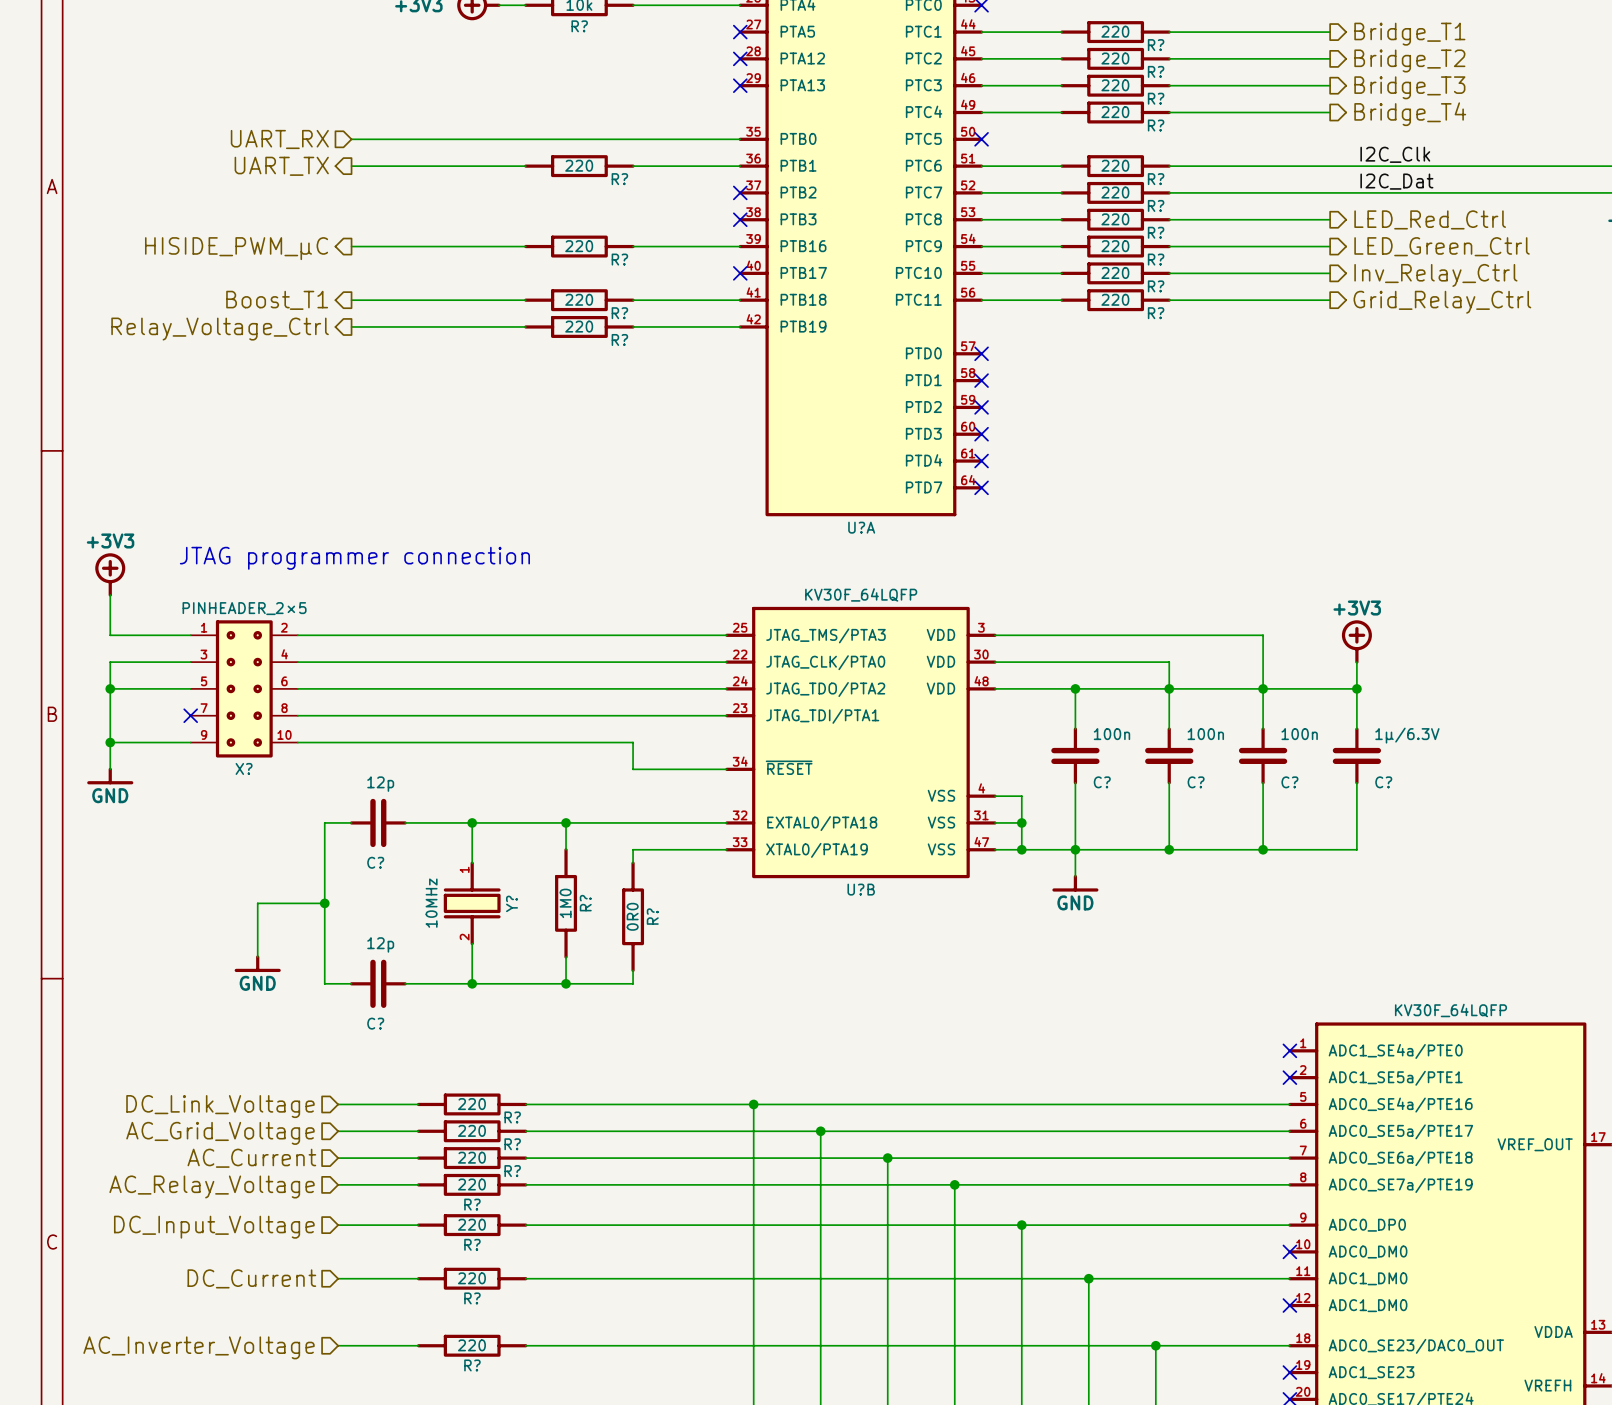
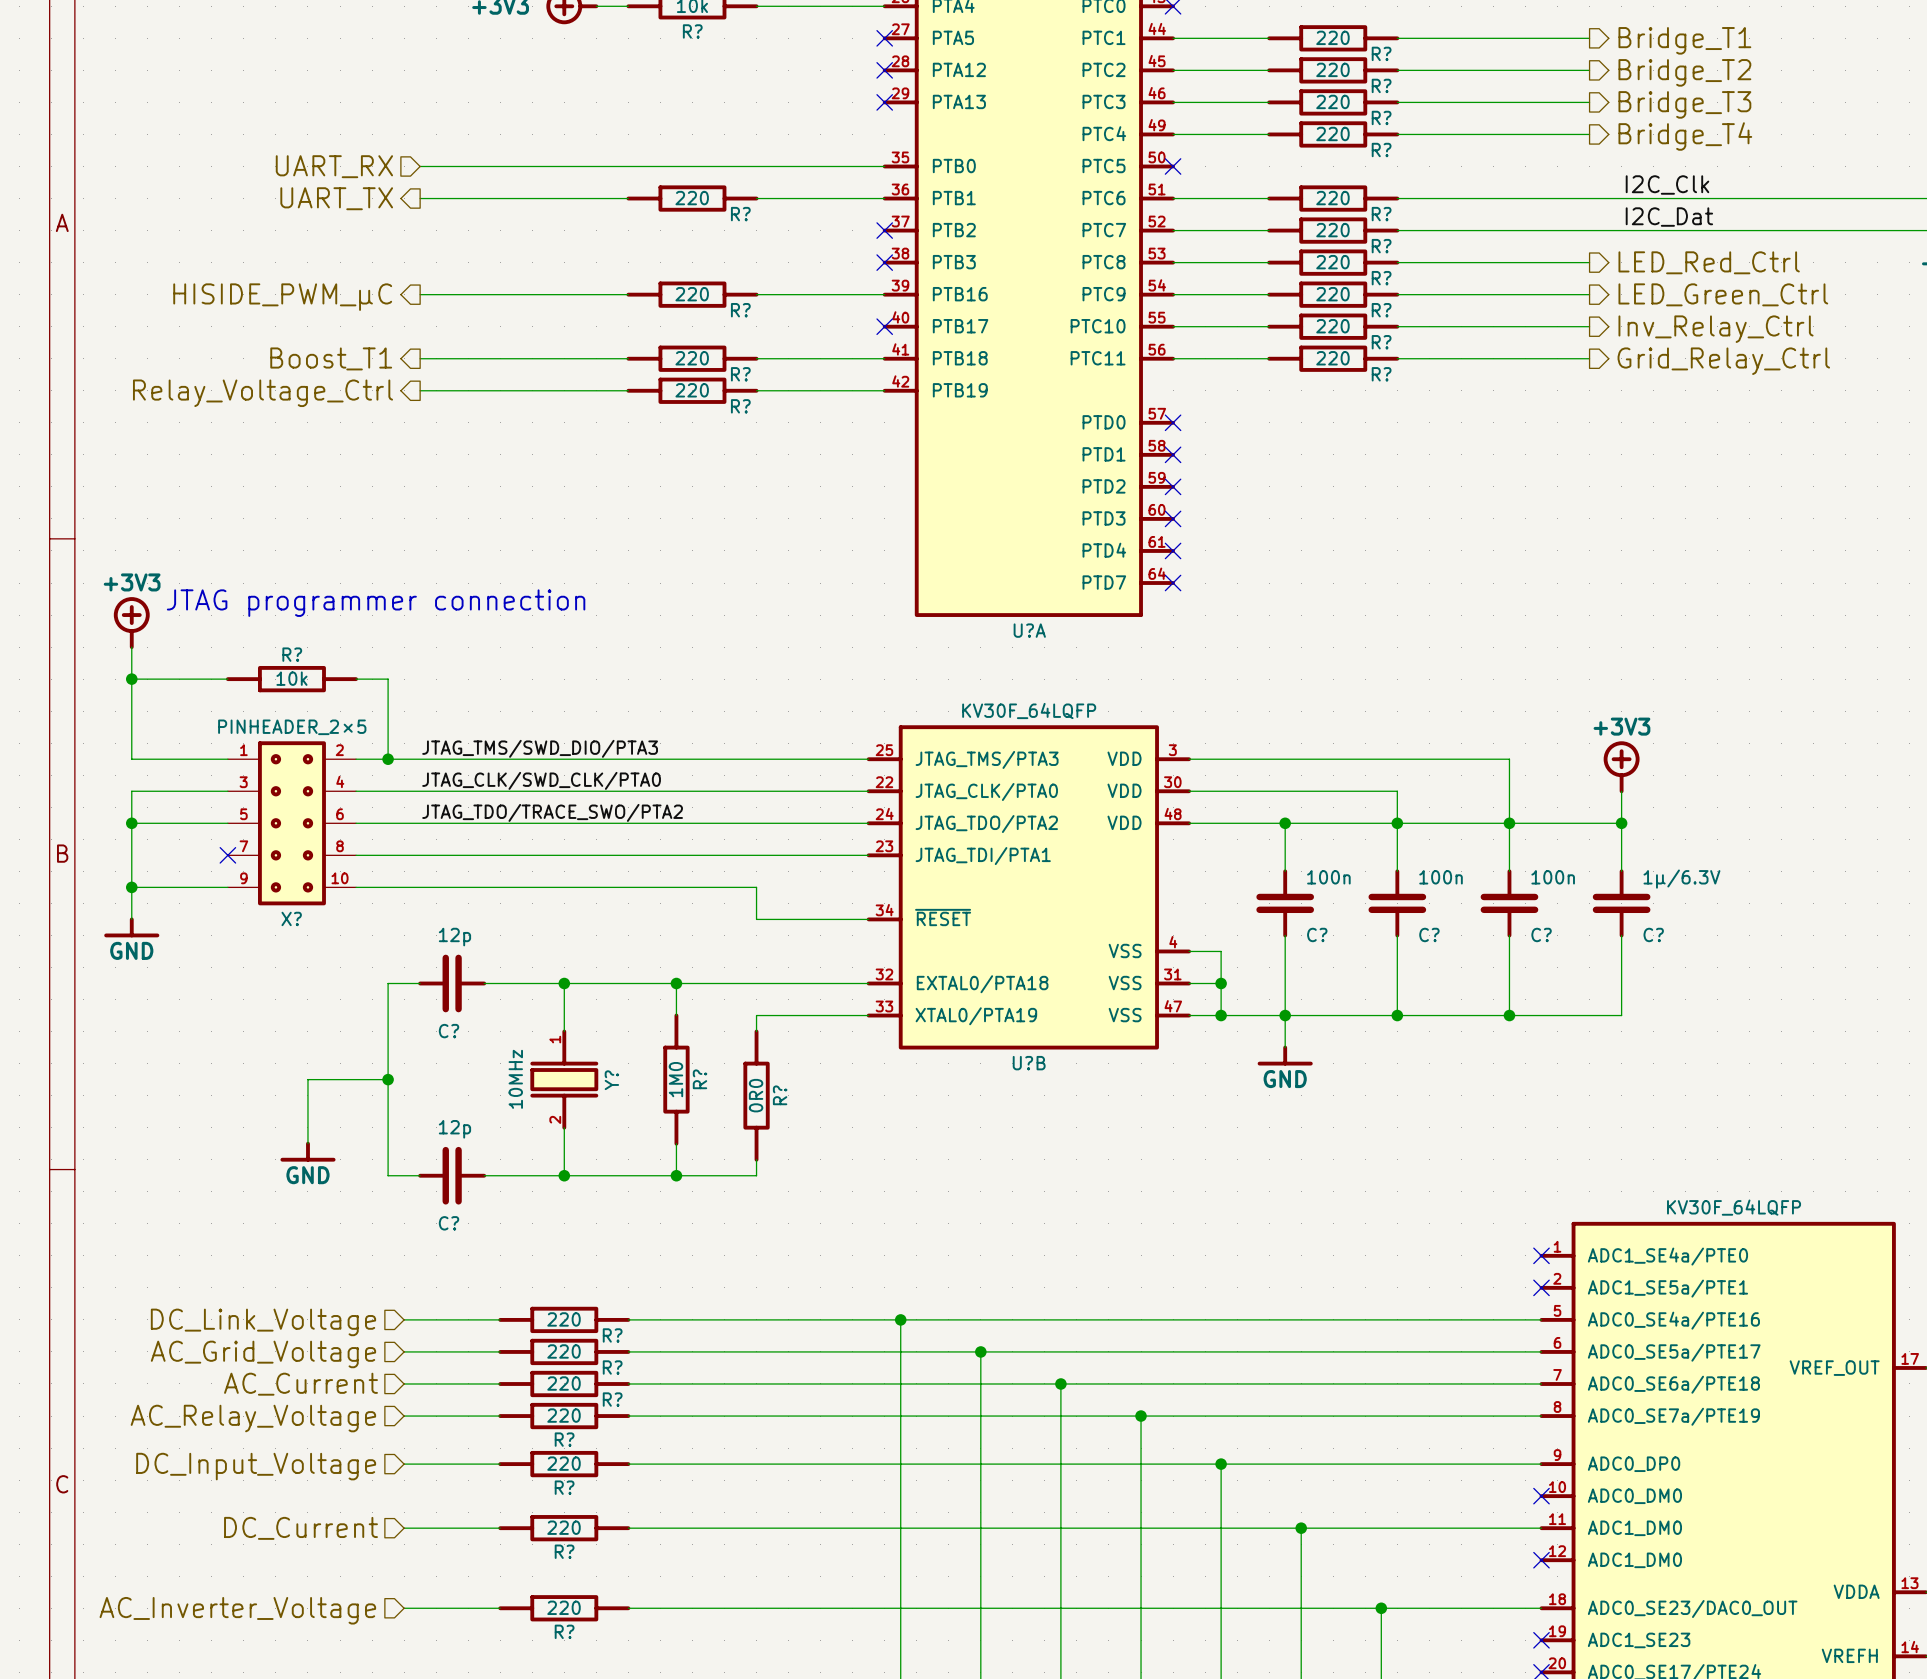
text position: JTAG programmer connection (354, 558) -> JTAG programmer connection (376, 603)
wire: none -> (131, 679) (227, 679)
junction: none -> (131, 679)
R?: none -> 10k (291, 679)
wire: none -> (356, 679) (388, 679) (388, 759)
power symbol position: +3V3 (110, 574) -> +3V3 (131, 623)
label: none -> JTAG_TMS/SWD_DIO/PTA3 (540, 748)
junction: none -> (388, 759)
label: none -> JTAG_CLK/SWD_CLK/PTA0 (541, 780)
label: none -> JTAG_TDO/TRACE_SWO/PTA2 (552, 812)

